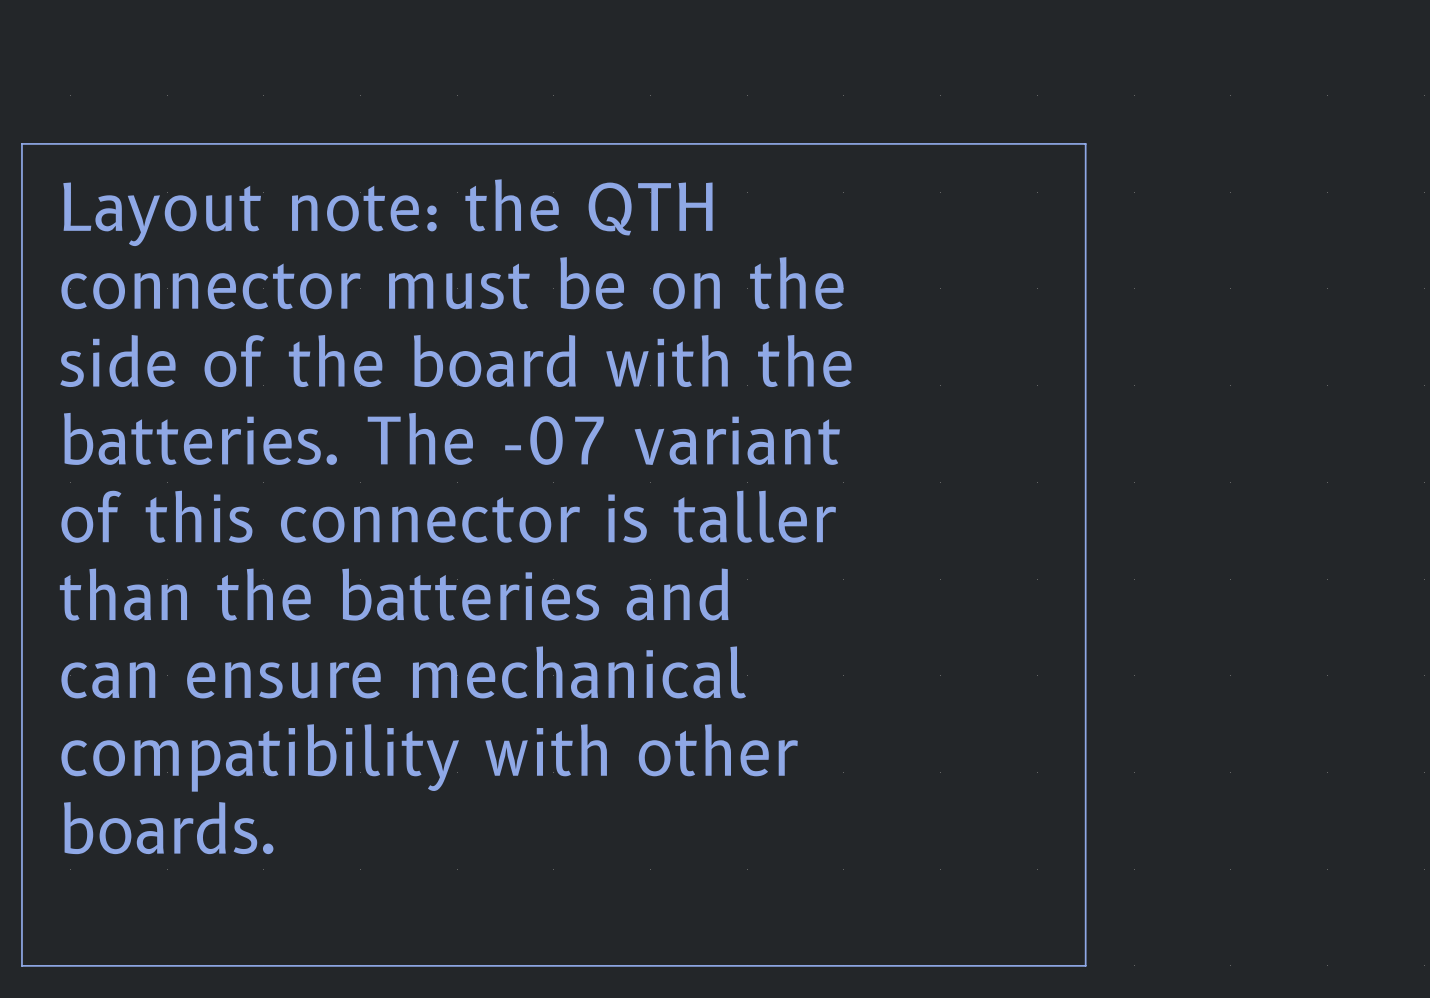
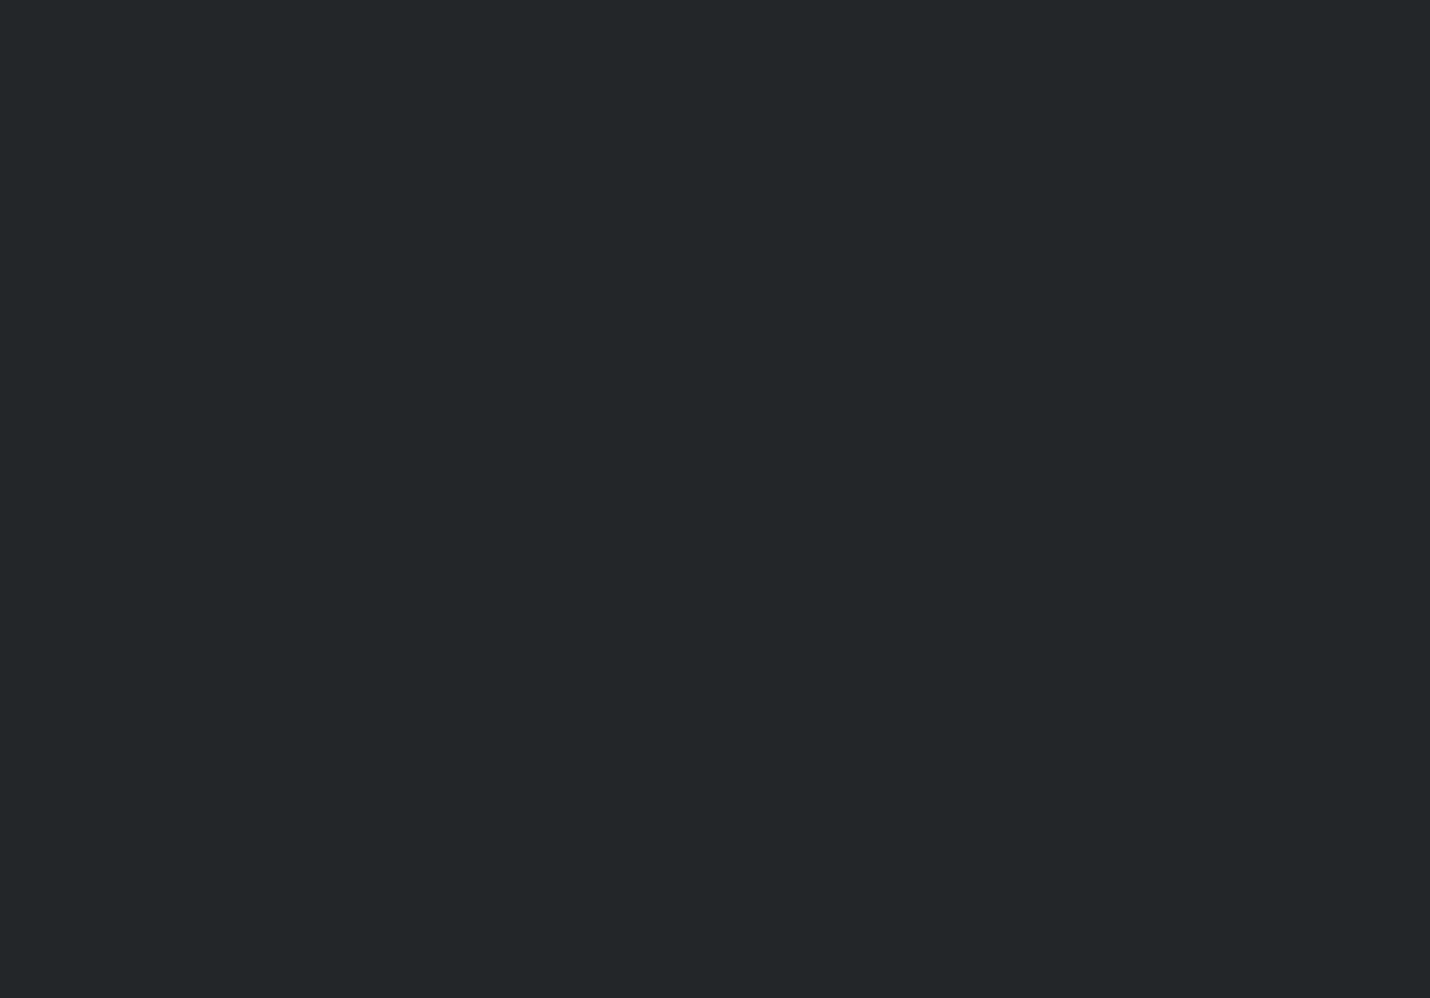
line: (21, 143) (1085, 143) (1085, 965) (21, 965) (21, 143) -> none
text: Layout note: the QTH (387, 212) -> none
text: connector must be on the (452, 283) -> none
text: side of the board with the (455, 361) -> none
text: batteries. The -07 variant (451, 438) -> none
text: of this connector is taller (448, 516) -> none
text: than the batteries and (394, 594) -> none
text: can ensure mechanical (403, 672) -> none
text: compatibility with other (429, 757) -> none
text: boards. (168, 828) -> none

